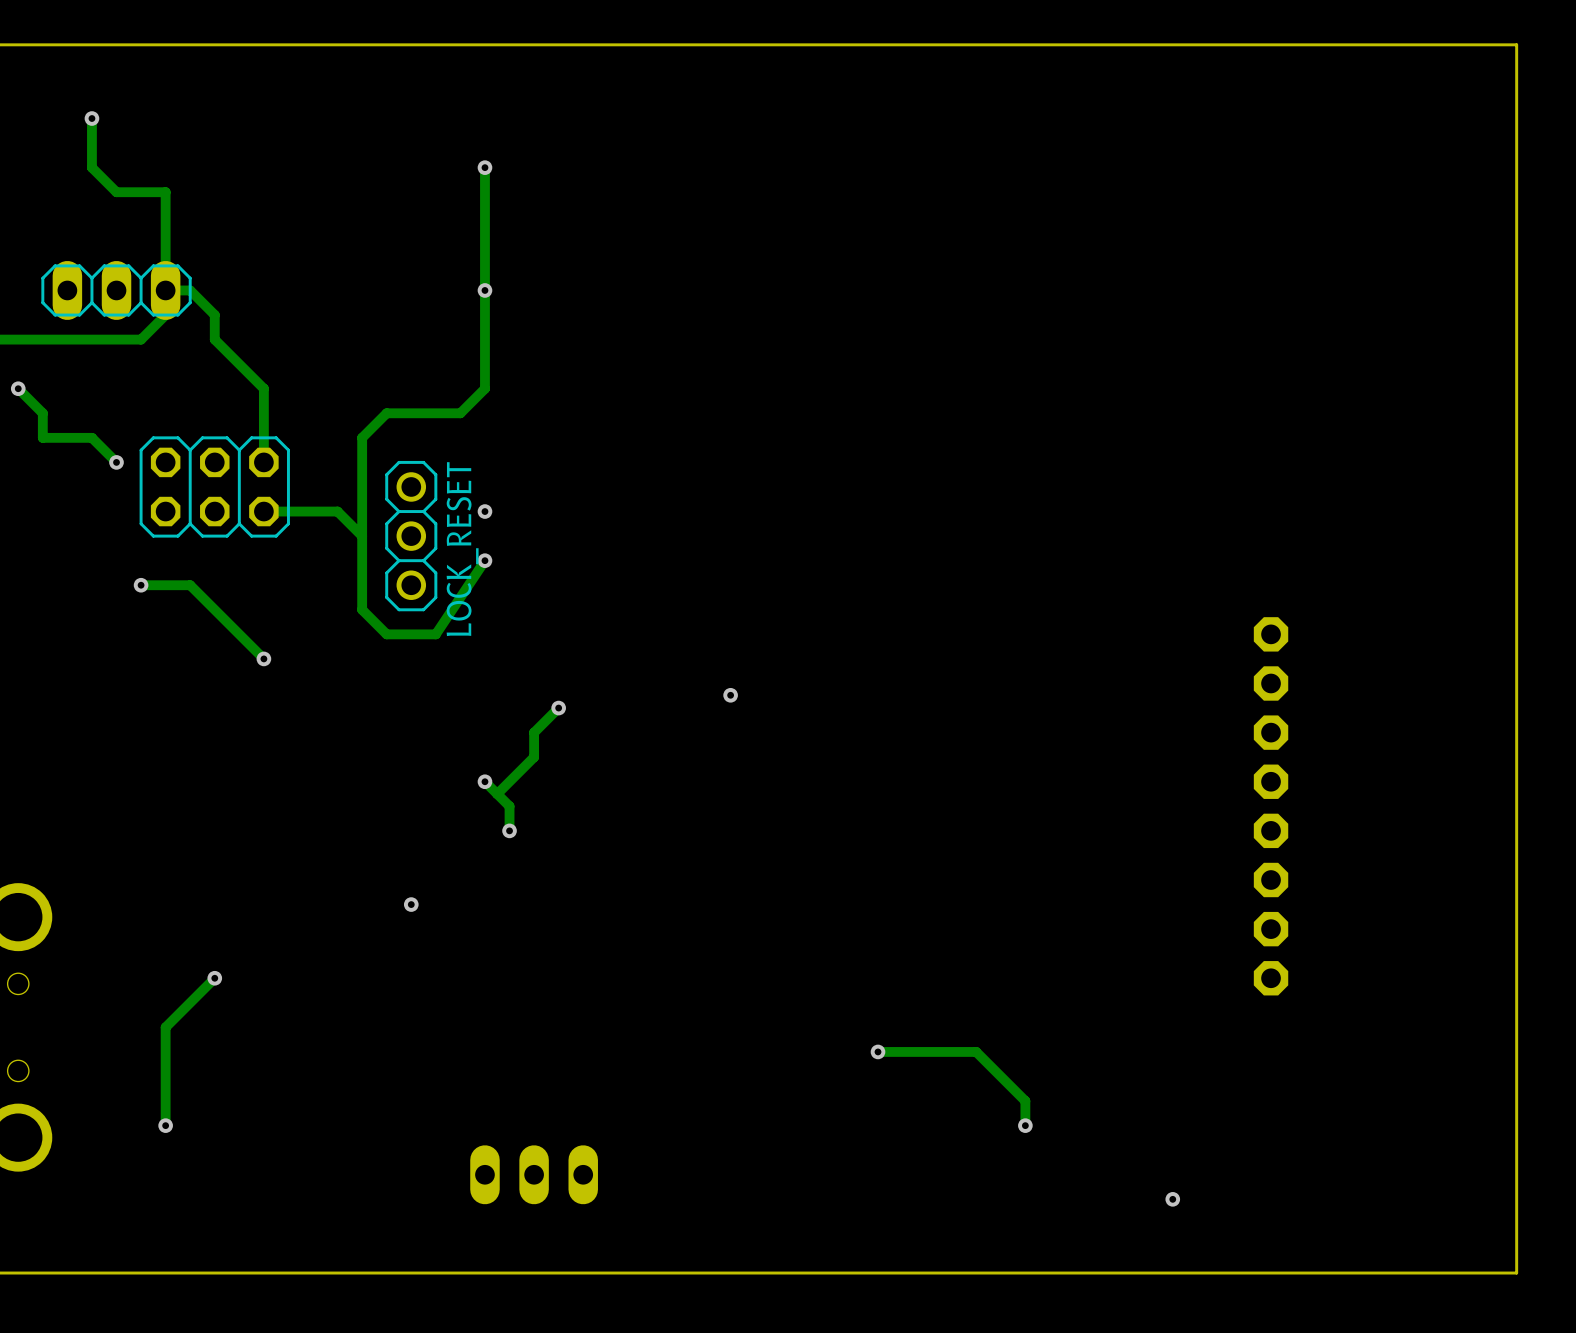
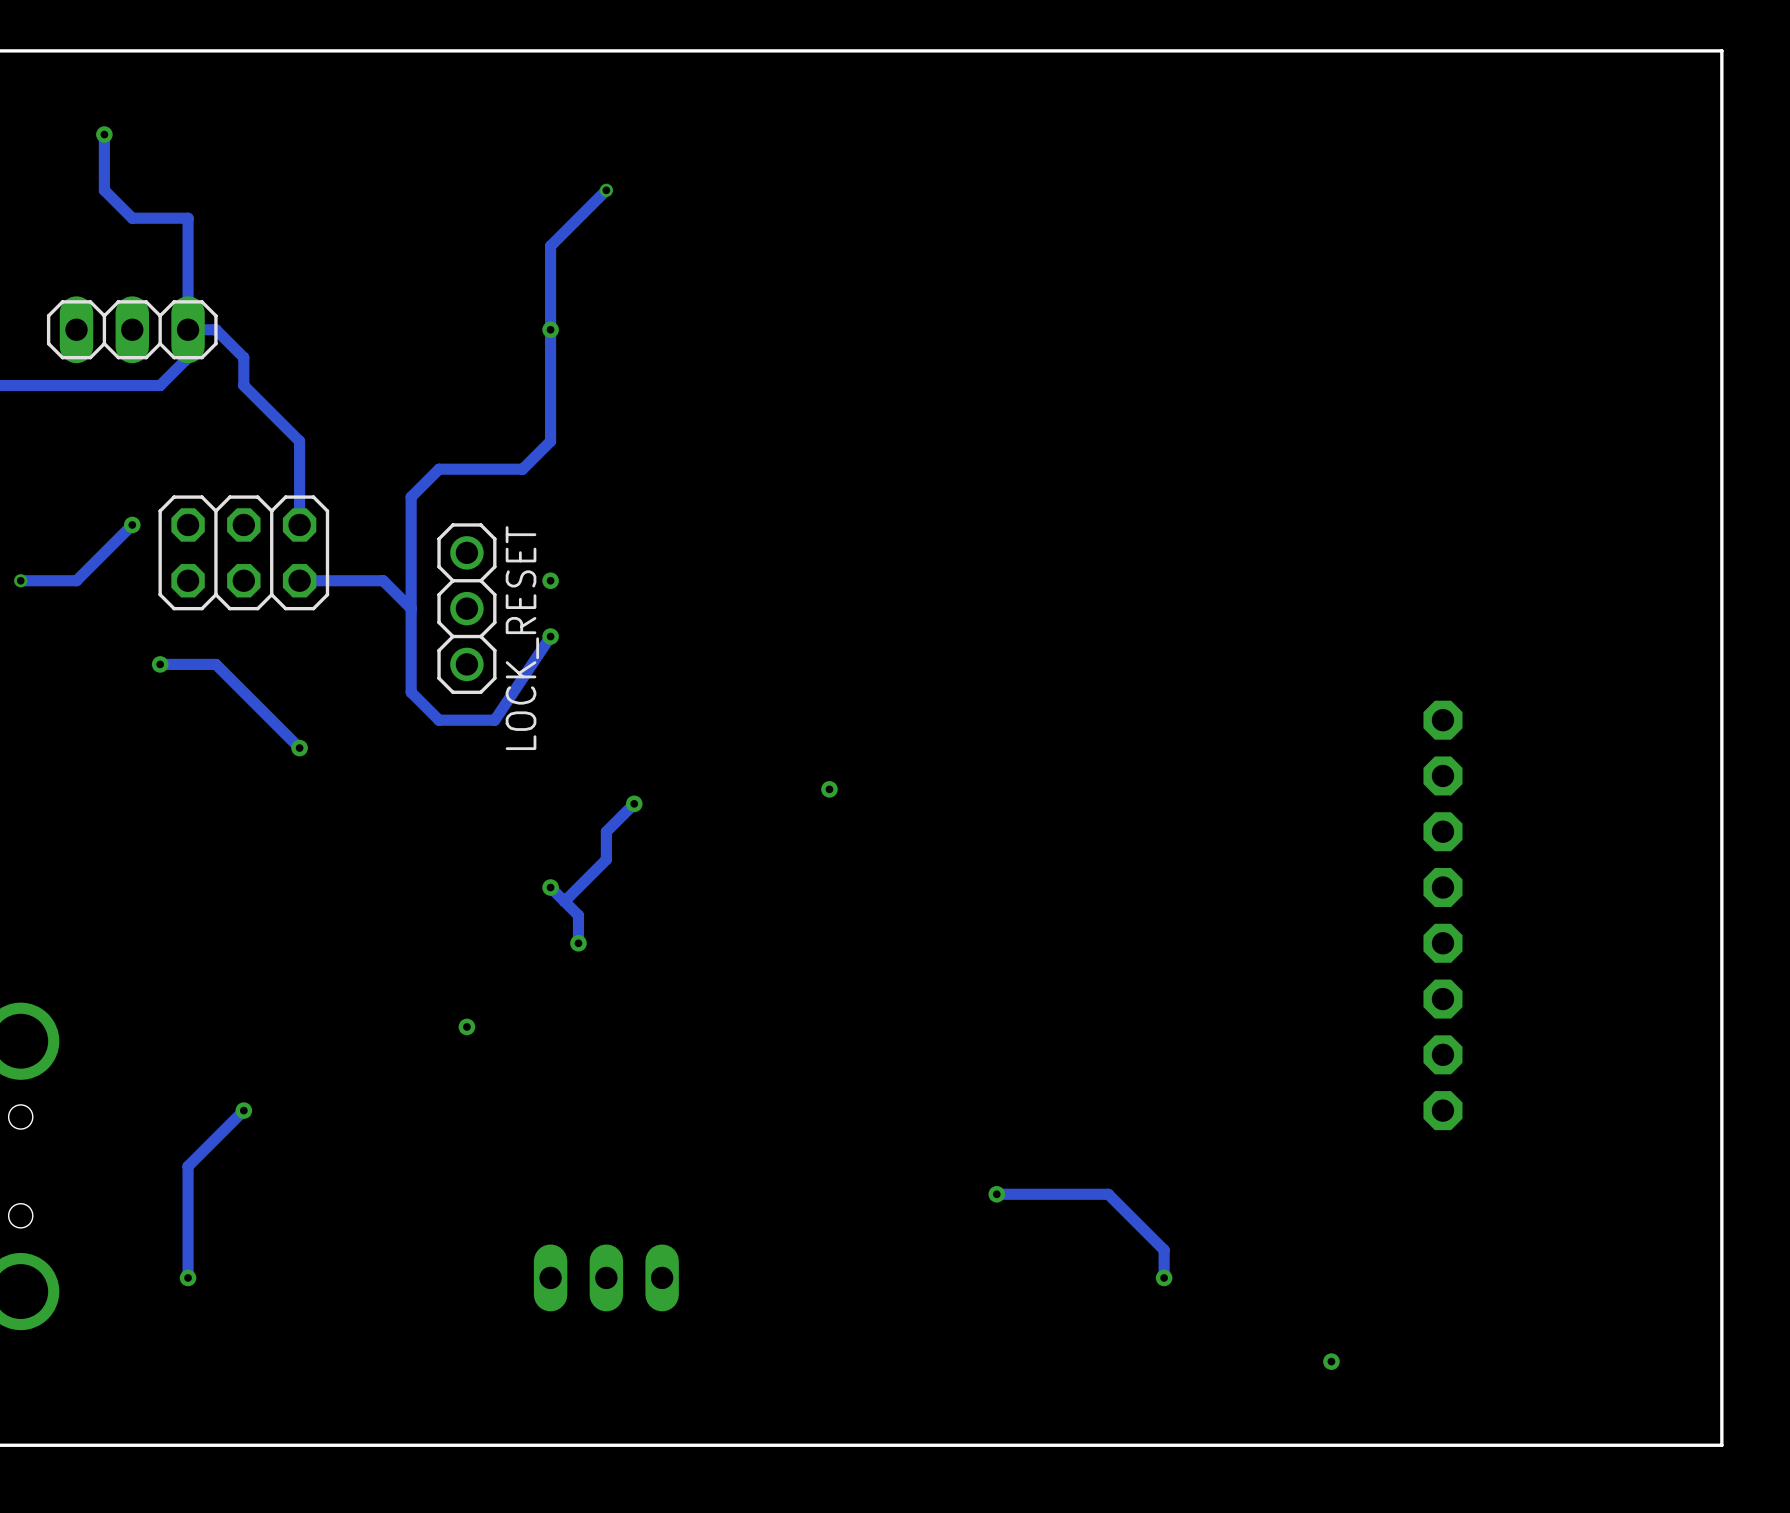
track: (484, 167) (484, 216) -> (606, 190) (550, 246)
via: (484, 167) -> none
via: none -> (606, 190)
track: (18, 388) (42, 413) (42, 437) (91, 437) (116, 462) -> (20, 580) (76, 580) (132, 524)
via: (18, 388) -> none
via: none -> (20, 580)
part position: (534, 1174) -> (606, 1277)

